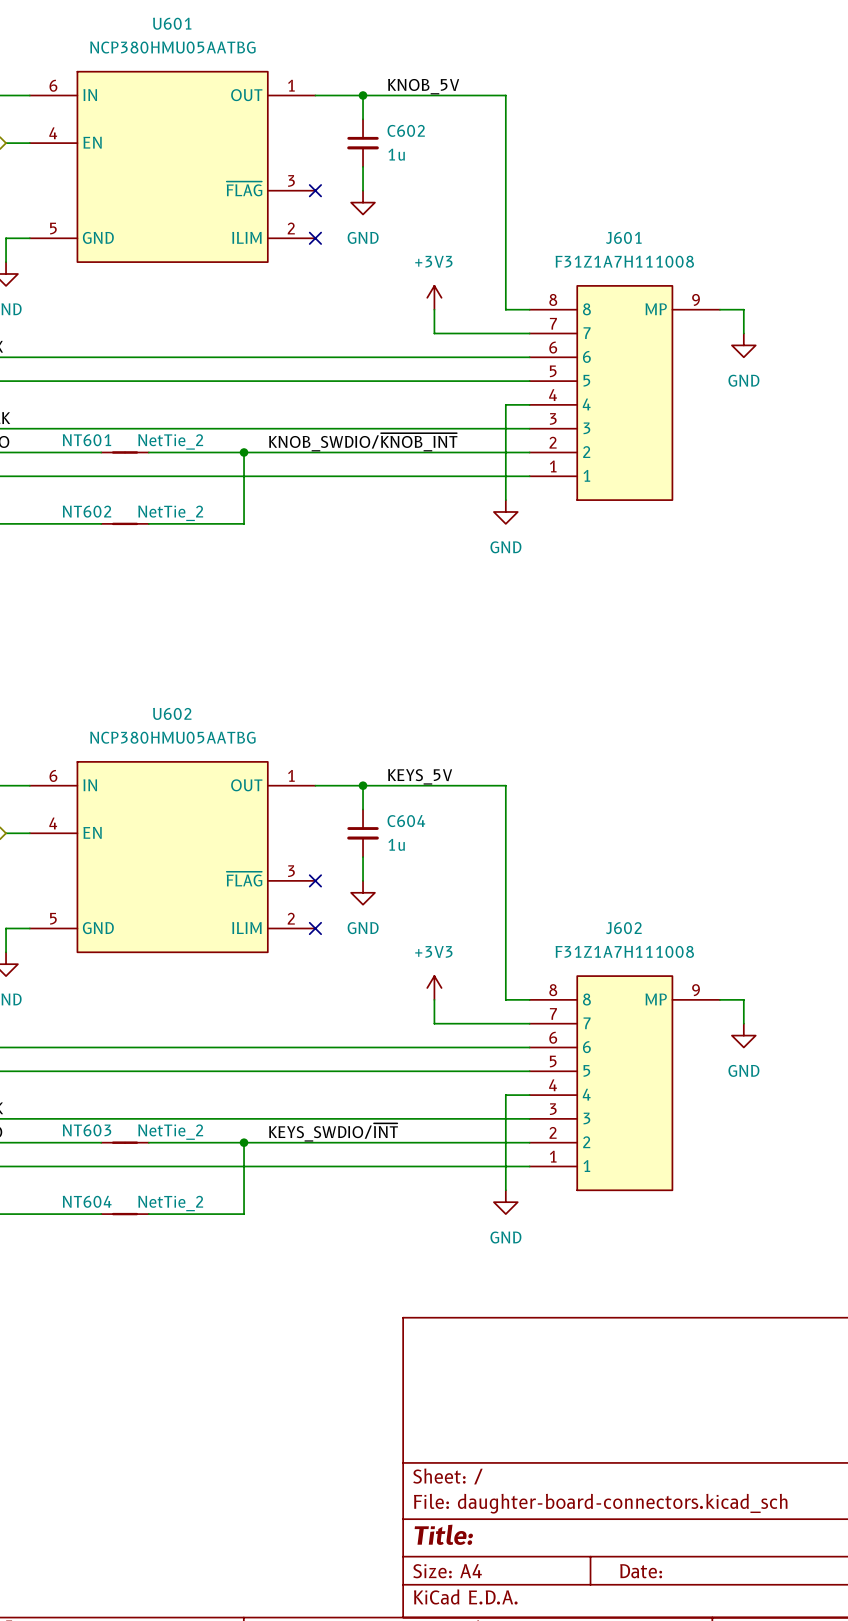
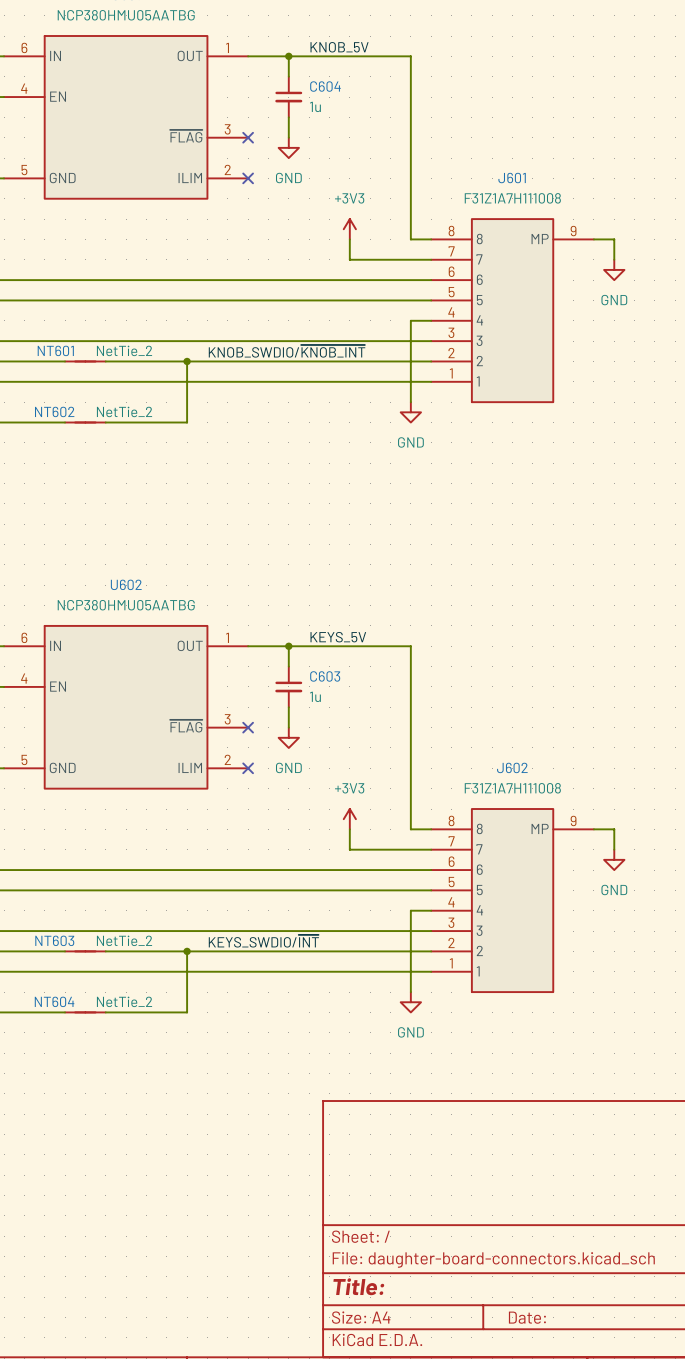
C602 name: C602 (406, 130) -> C604 (325, 86)
C604 name: C604 (406, 821) -> C603 (325, 676)

